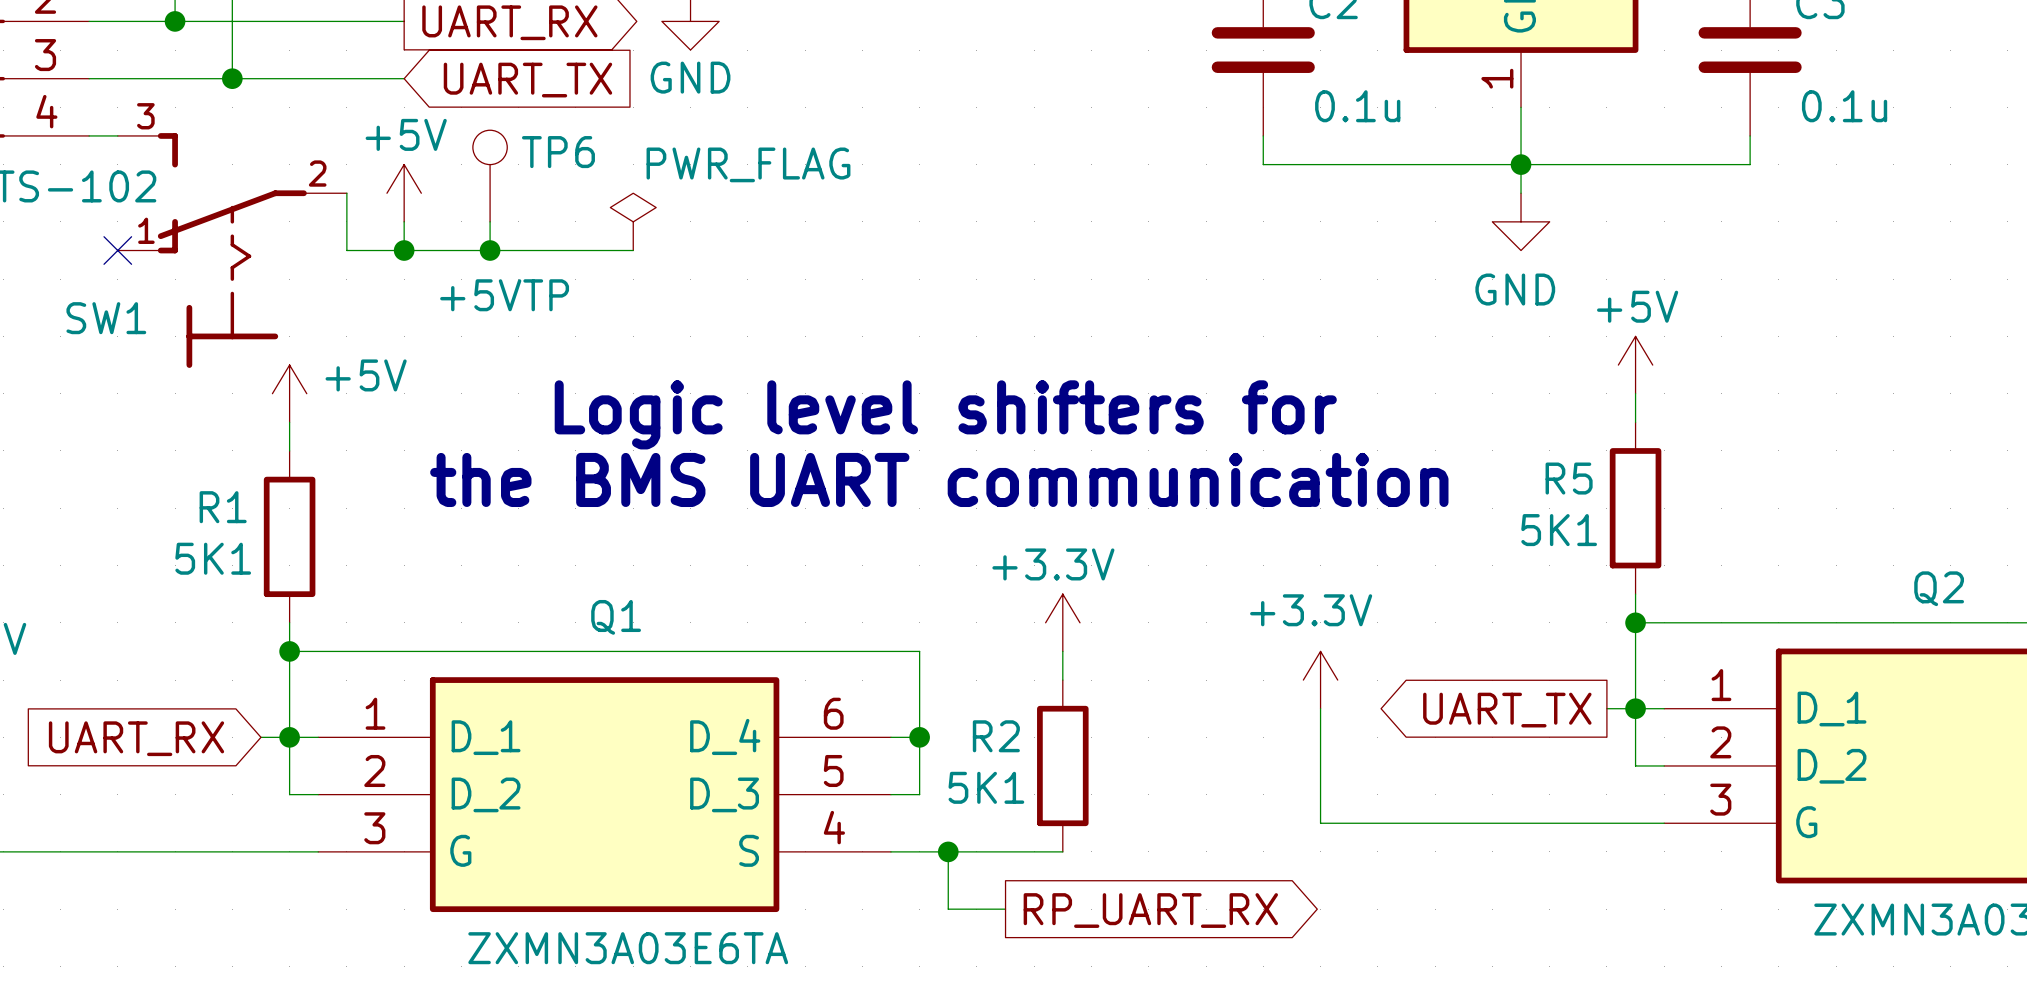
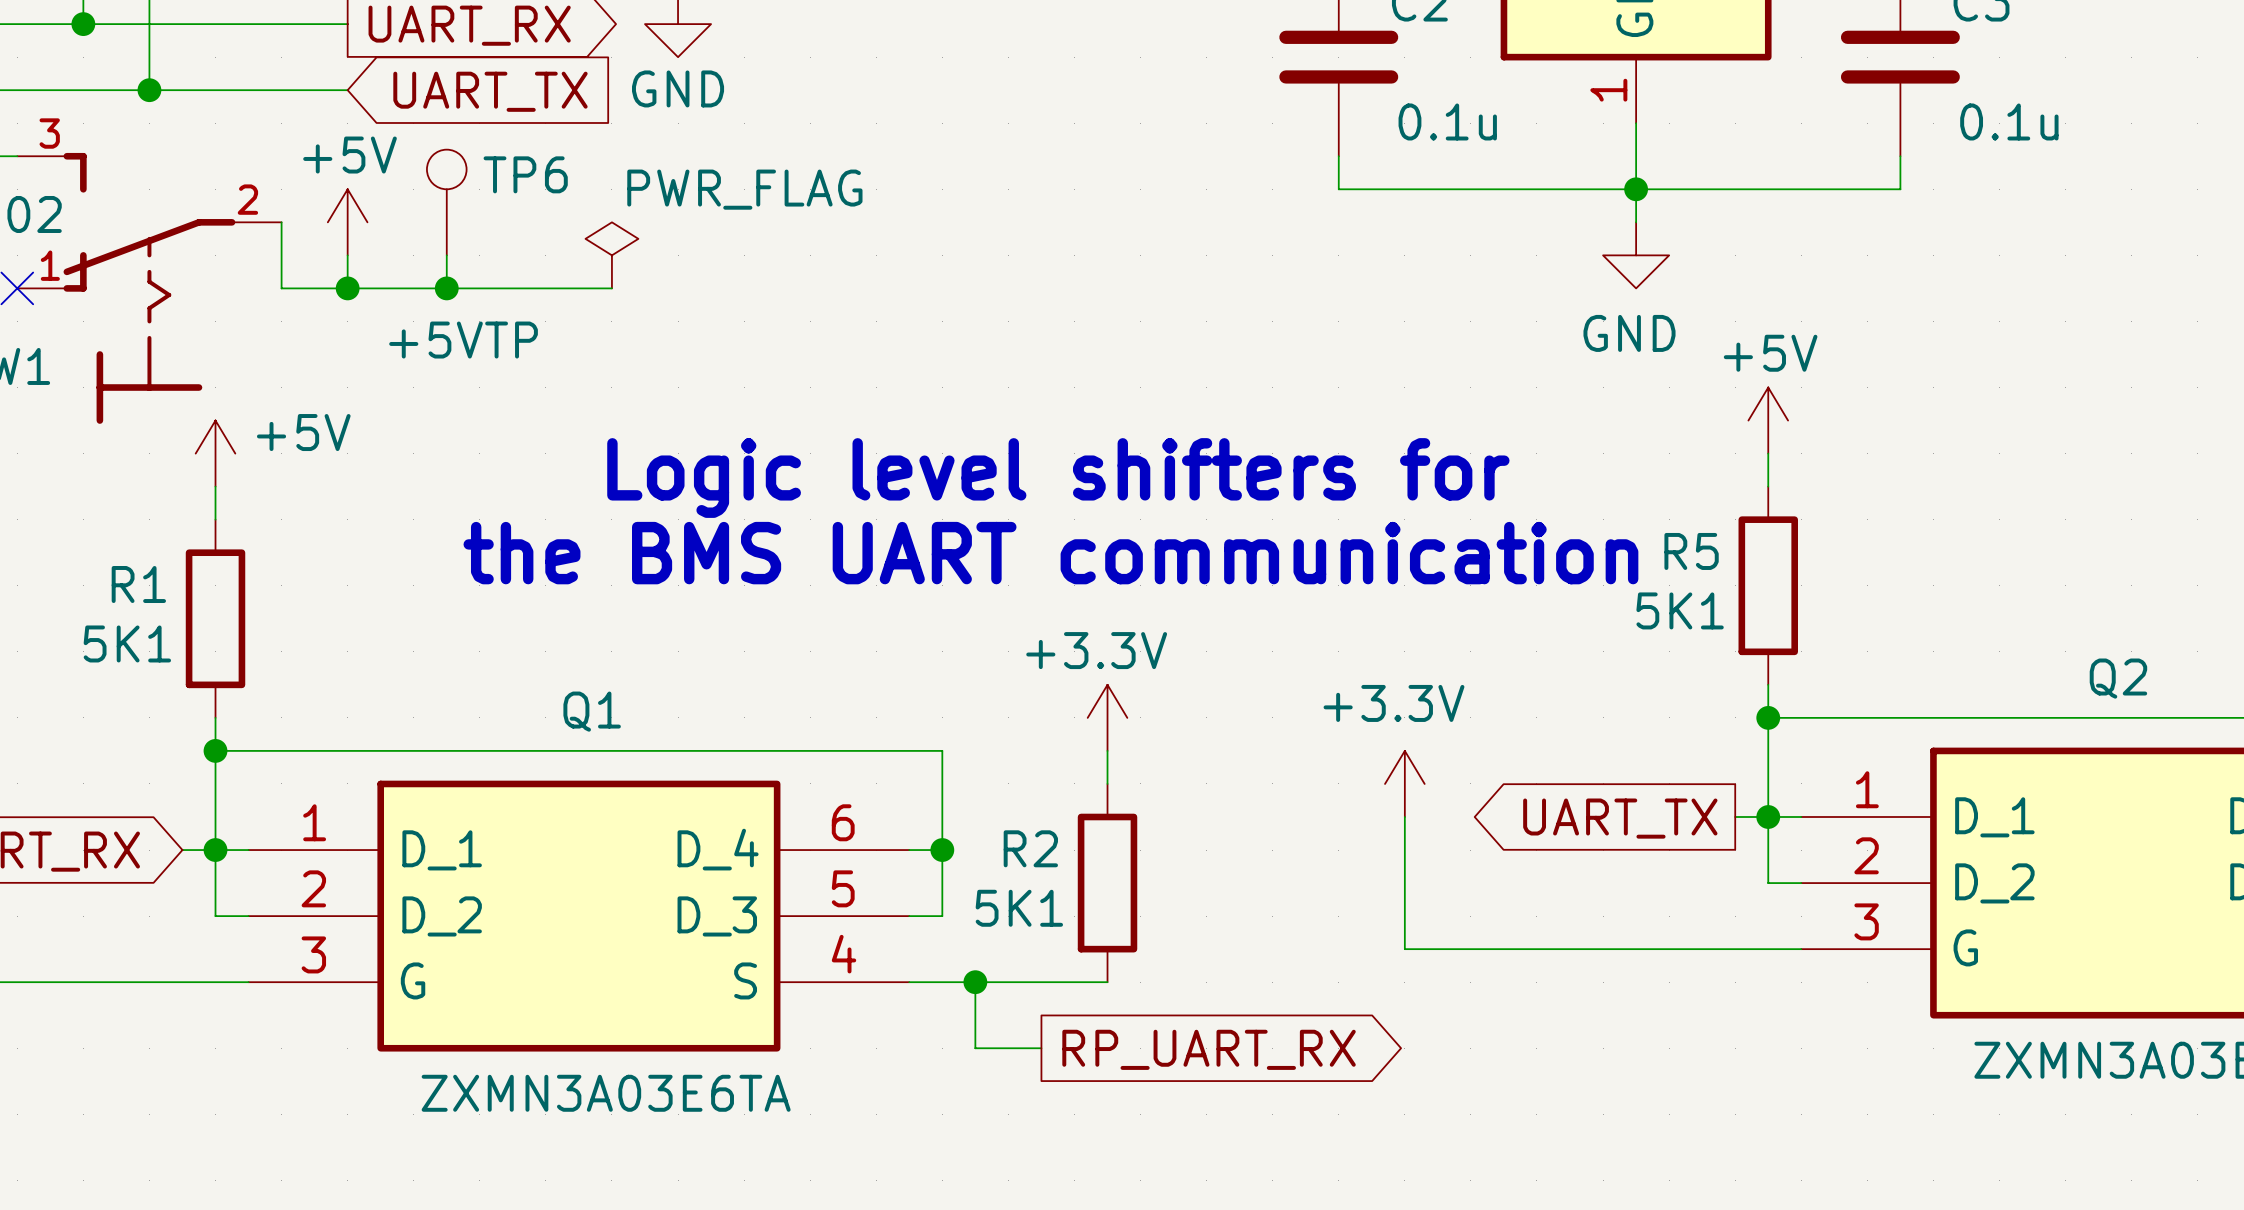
text position: Logic level shifters for (945, 414) -> Logic level shifters for (1058, 478)
text position: the BMS UART communication (939, 479) -> the BMS UART communication (1050, 553)

